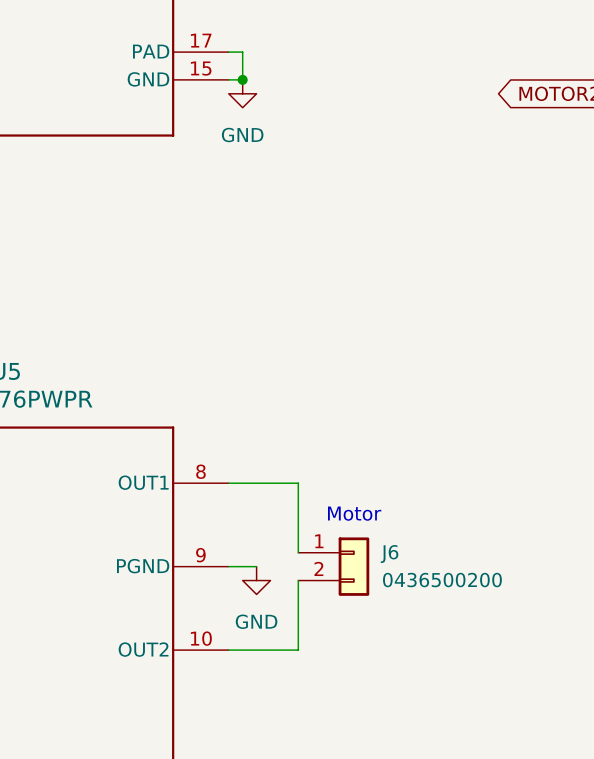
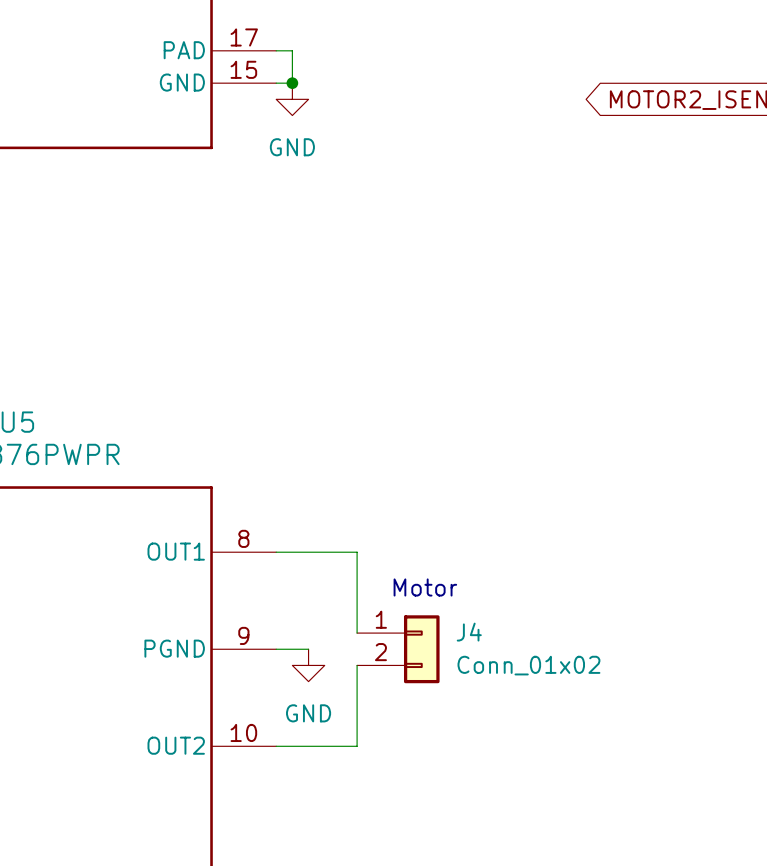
J6 name: J6 (389, 553) -> J4 (469, 632)
J6 value: 0436500200 (442, 580) -> Conn_01x02 (528, 665)

